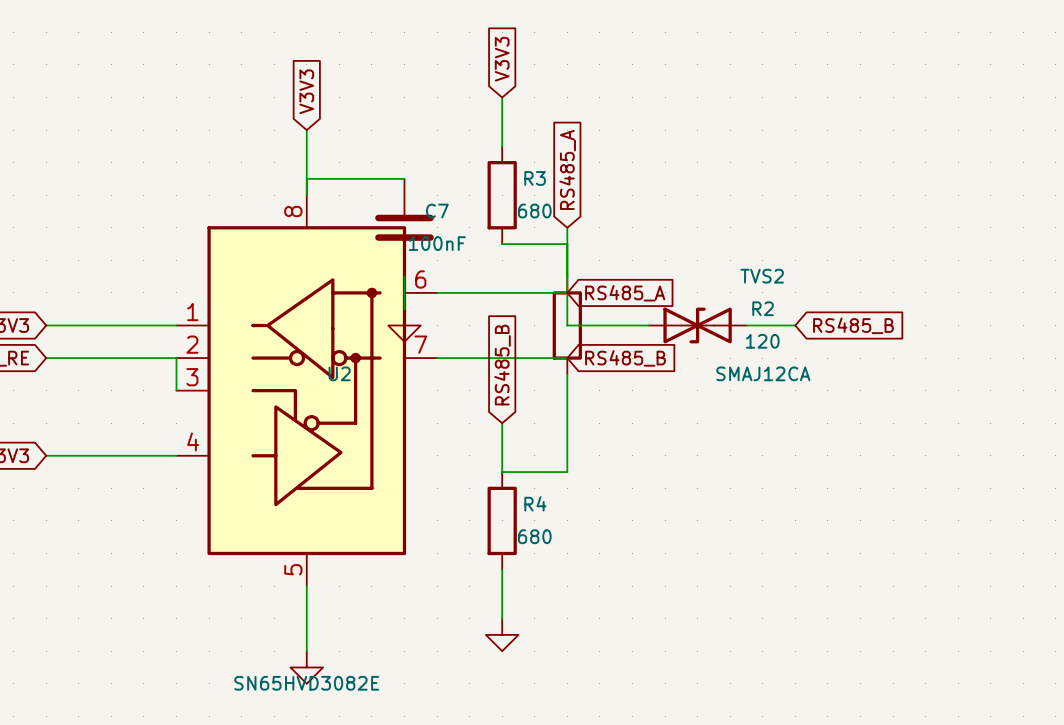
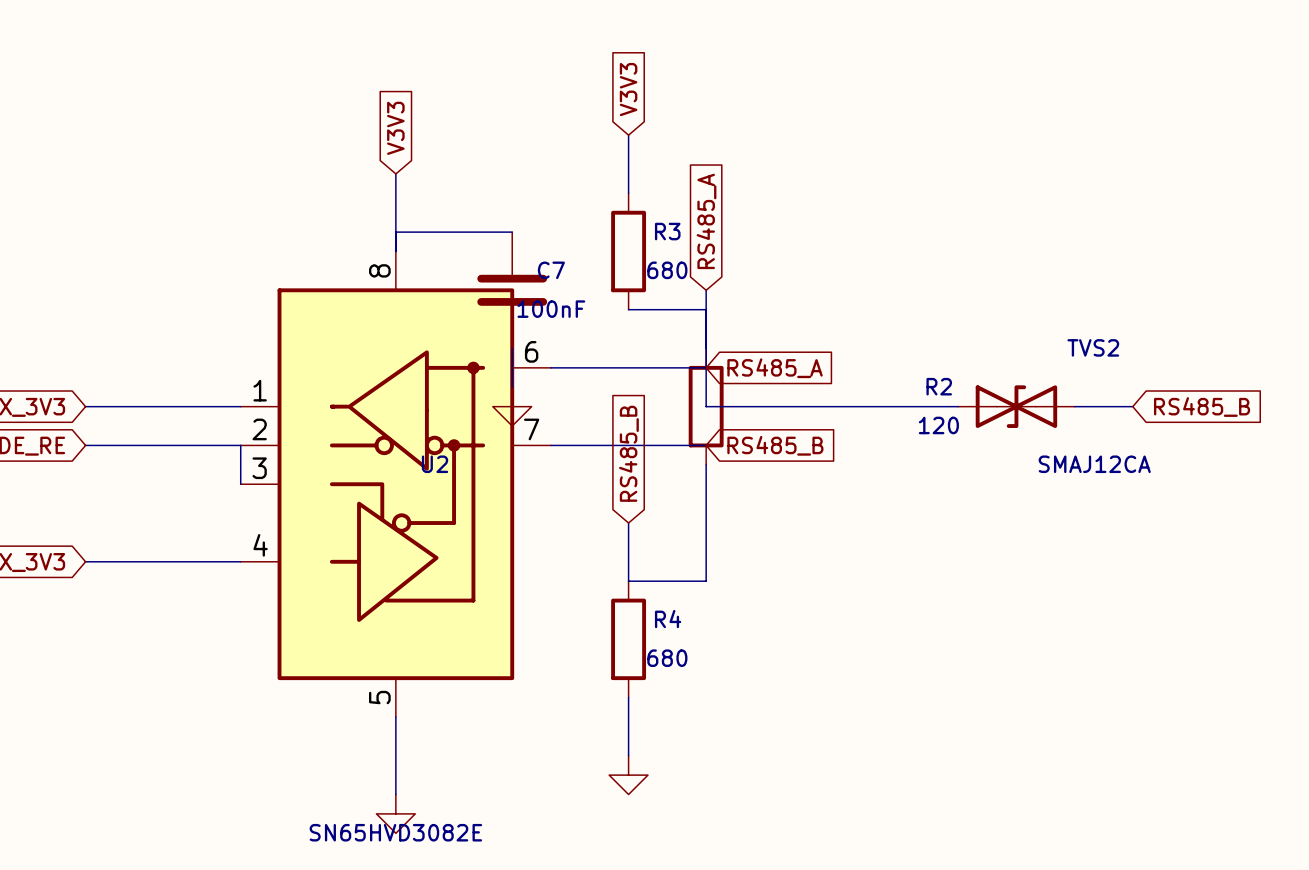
TVS2 position: (697, 325) -> (1016, 406)
global label position: RS485_B (853, 325) -> RS485_B (1202, 407)
wire: none -> (1074, 406) (1132, 406)

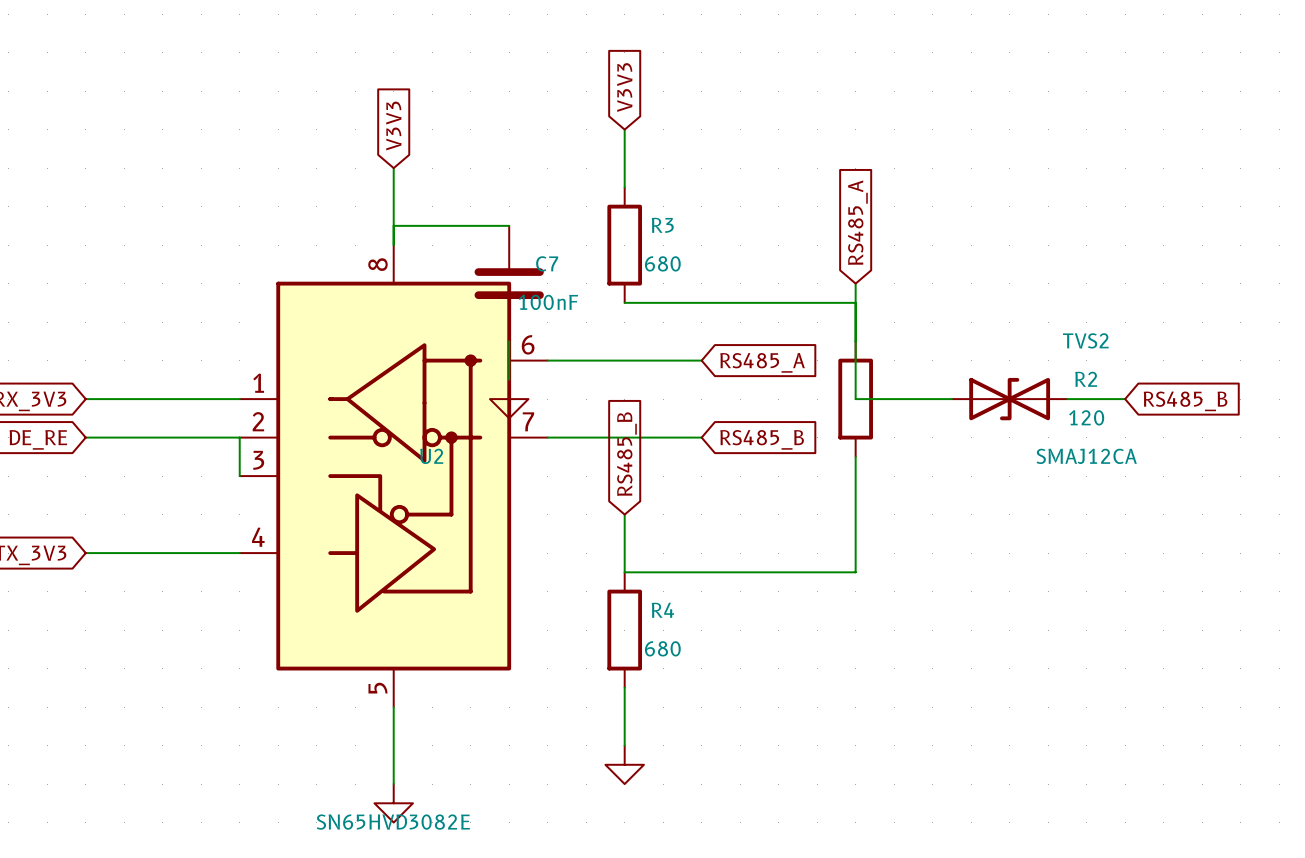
global label position: RS485_A (706, 221) -> RS485_A (857, 222)
wire: (706, 290) (706, 406) (861, 406) -> (855, 283) (855, 399)
wire: none -> (701, 302) (855, 302)
R2 position: (706, 406) -> (855, 399)
wire: (706, 464) (706, 581) -> (855, 456) (855, 572) (701, 572)

